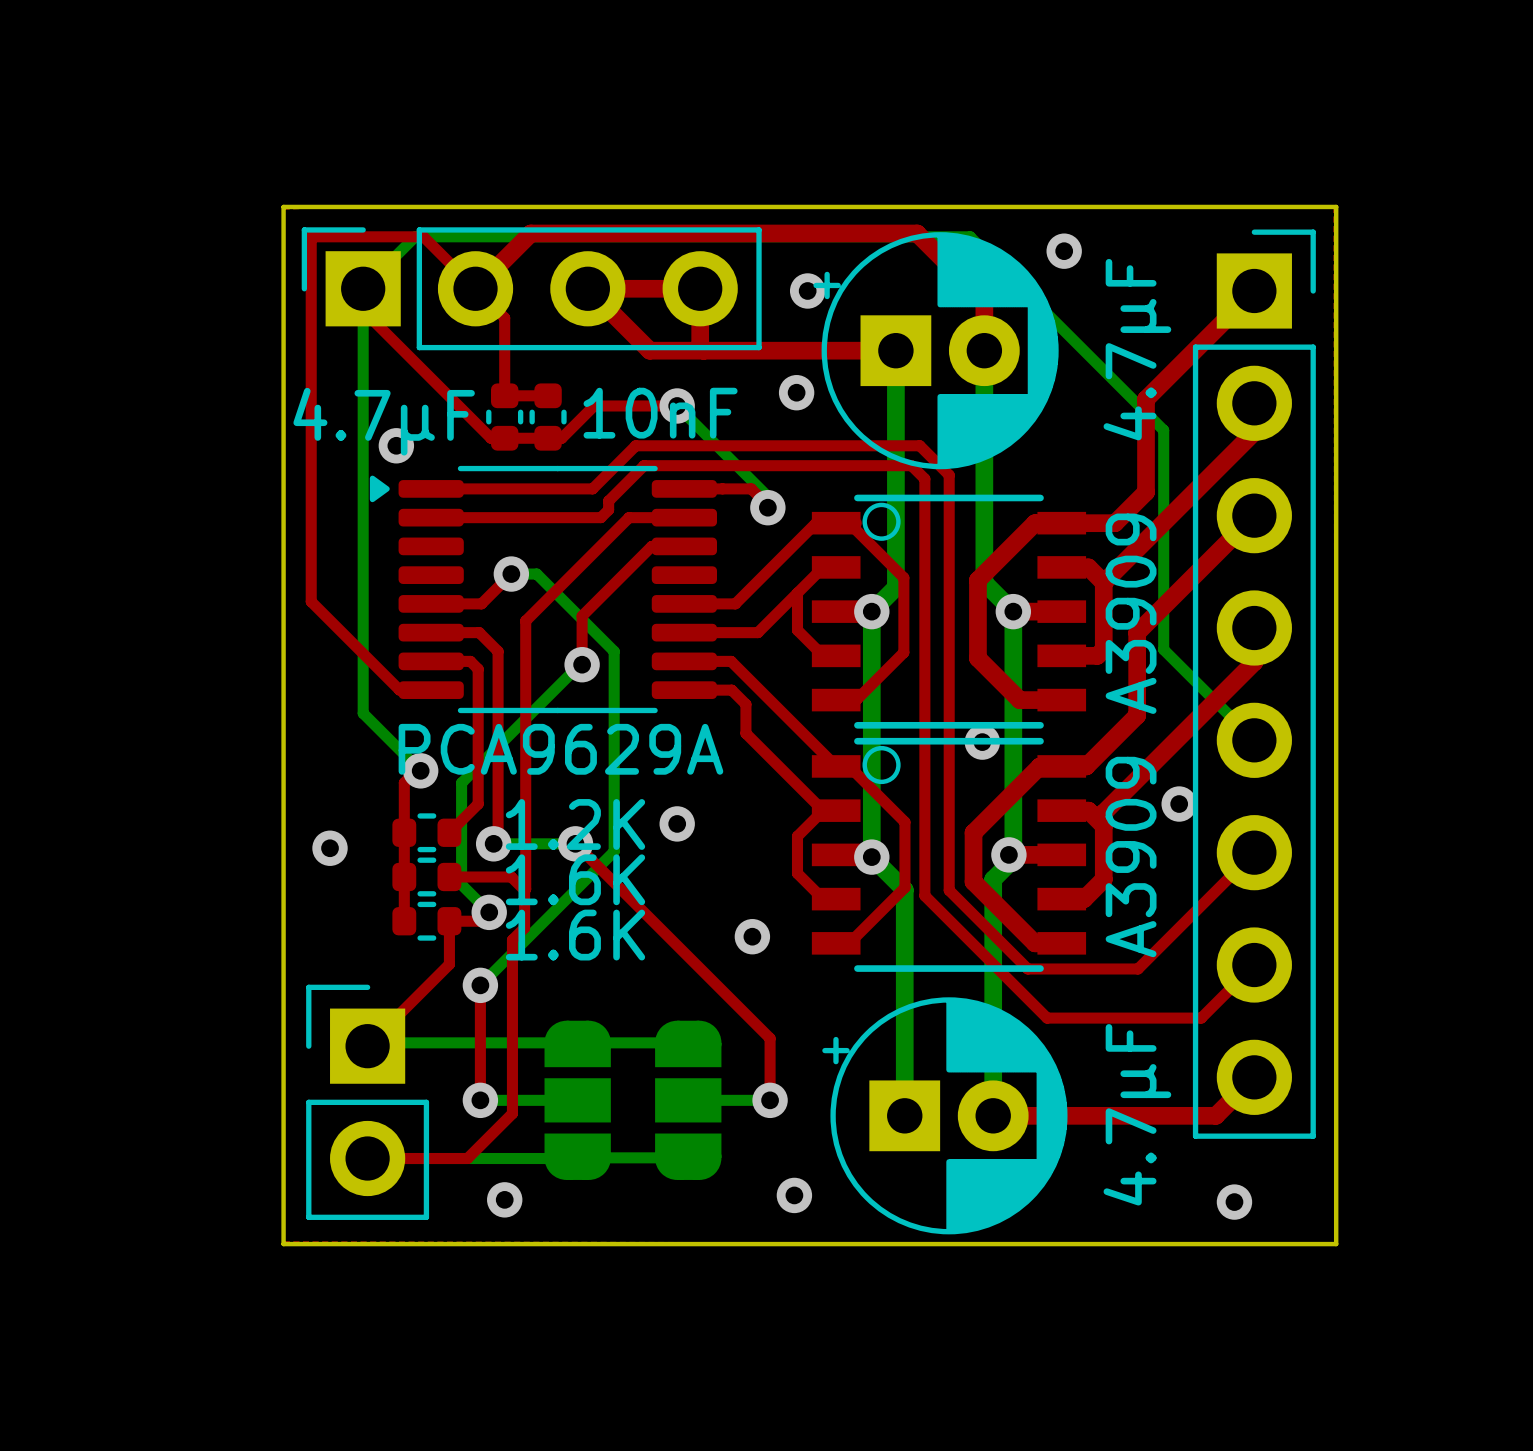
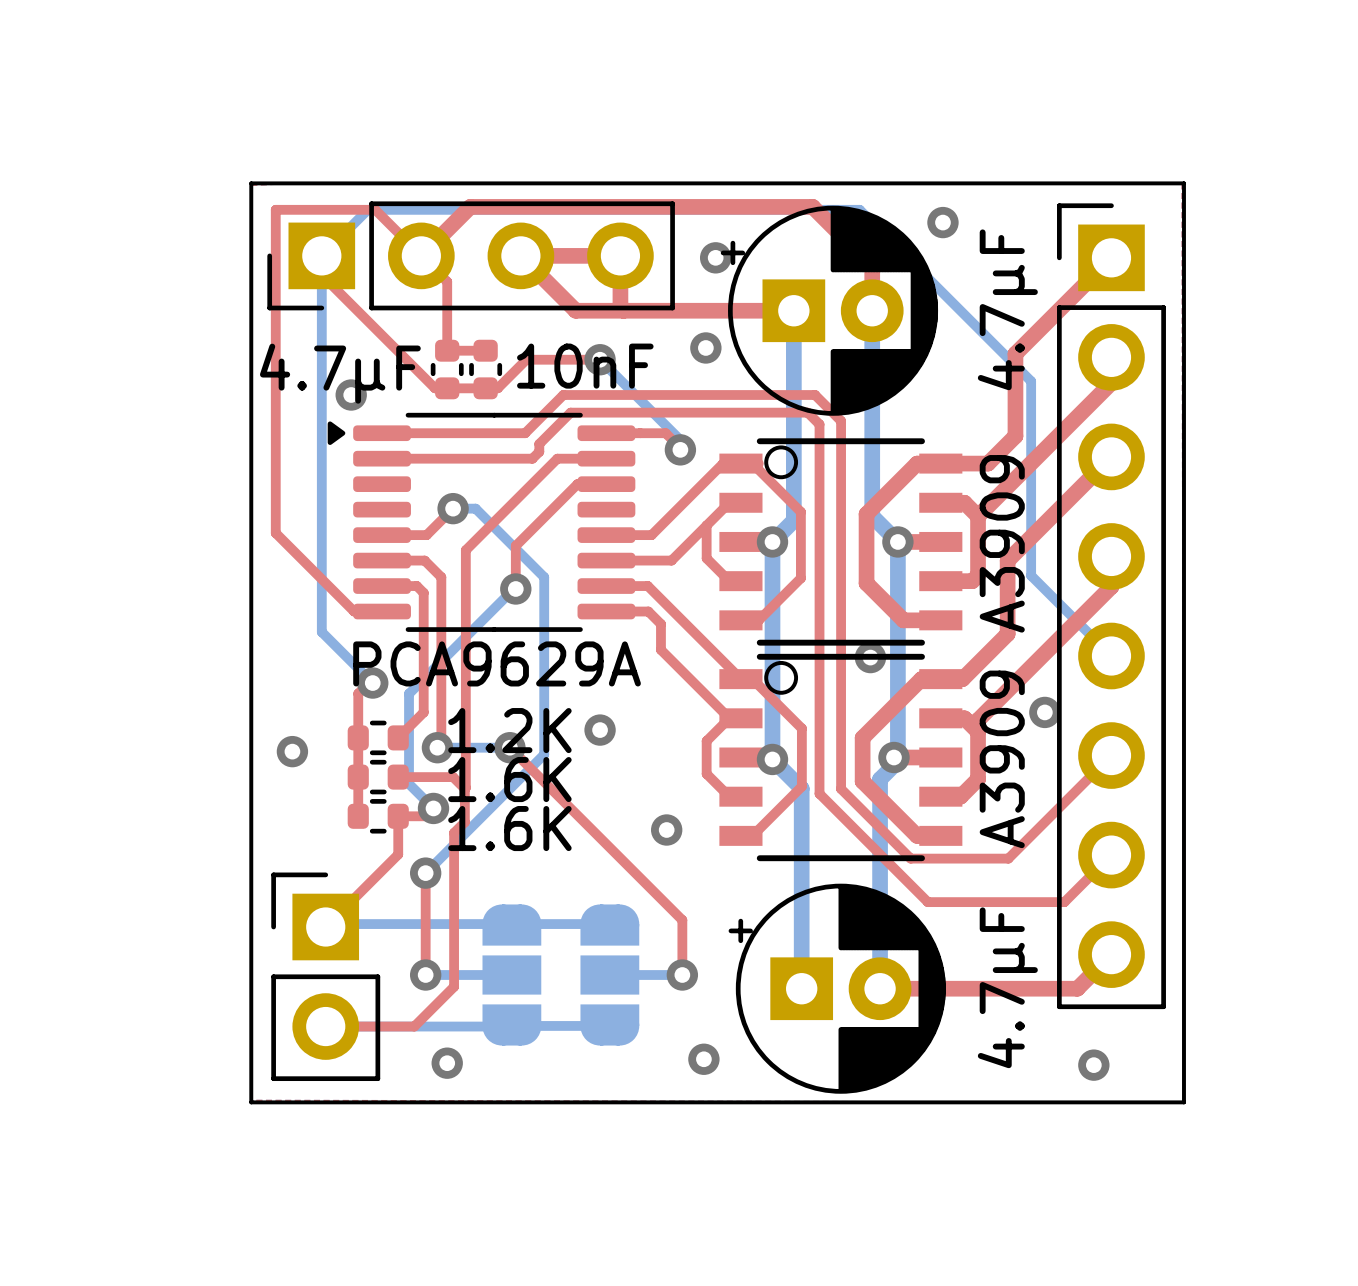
part footprint: [301, 227, 762, 351] -> [267, 201, 675, 311]
part footprint: [1192, 229, 1316, 1139] -> [1057, 203, 1166, 1010]

